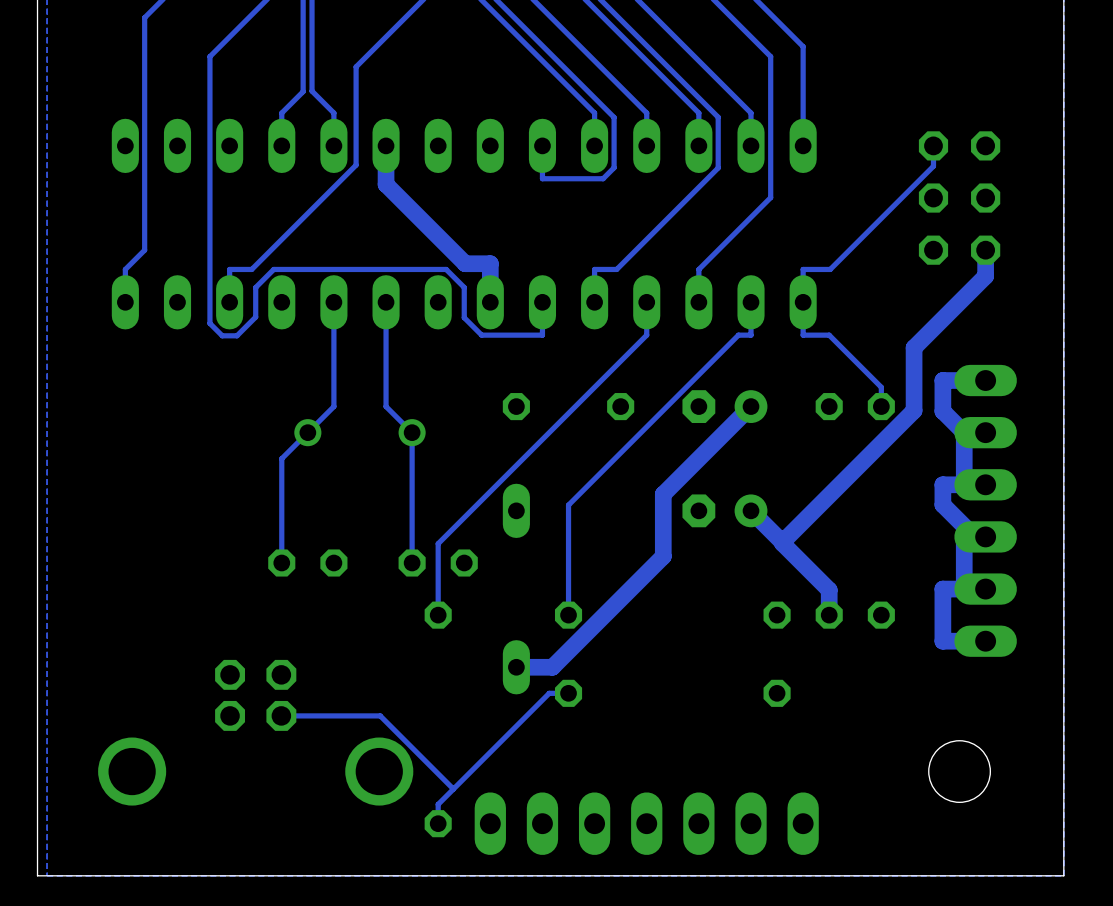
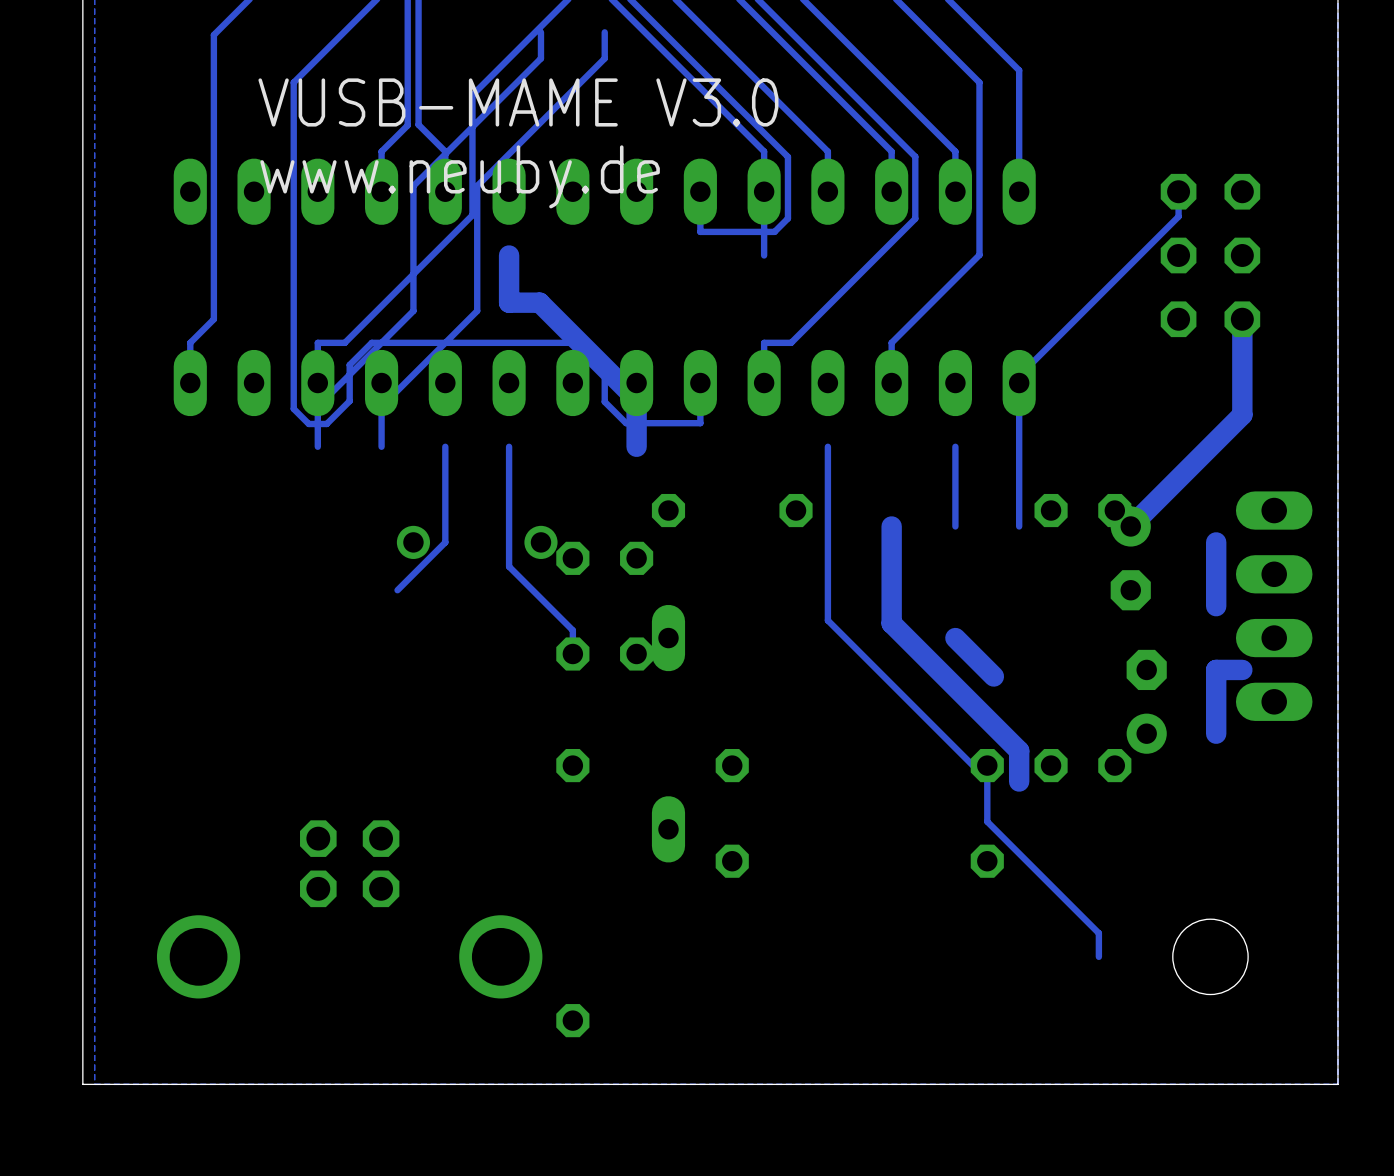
track: none -> (540, 32) (540, 58) (413, 186) (413, 310) (317, 406) (317, 446)
track: none -> (604, 32) (604, 58) (477, 186) (477, 310) (381, 406) (381, 446)
text: none -> VUSB-MAME V3.0 (518, 102)
text: none -> www.neuby.de (460, 176)
track: (386, 145) (386, 184) (465, 263) (490, 263) (490, 302) -> none
track: none -> (509, 255) (509, 302) (539, 302) (636, 399) (636, 446)
track: (830, 269) (803, 269) (803, 296) -> (1052, 342) (1019, 376)
track: (985, 276) (914, 347) (914, 410) (782, 542) (829, 590) (829, 615) -> (1242, 351) (1242, 414) (1130, 526)
track: (333, 302) (333, 354) -> none
track: (386, 302) (386, 354) -> (764, 191) (764, 255)
track: (646, 302) (646, 335) (438, 543) (438, 615) -> none
track: (751, 302) (751, 335) (738, 335) (568, 505) (568, 615) -> none
track: (803, 335) (829, 335) (881, 387) (881, 406) -> (1019, 423) (1019, 526)
track: none -> (827, 446) (827, 620) (987, 779) (987, 821) (1098, 933) (1098, 956)
track: none -> (955, 446) (955, 526)
track: (985, 380) (942, 380) (942, 411) (964, 432) (985, 432) -> none
track: (333, 406) (281, 458) (281, 562) -> (445, 510) (445, 542) (397, 590)
track: (386, 406) (412, 432) (412, 562) -> (509, 510) (509, 566) (572, 630) (572, 654)
part: (724, 406) -> none
track: (751, 406) (663, 494) (663, 556) (552, 667) (516, 667) -> none
track: none -> (891, 526) (891, 623) (1019, 750) (1019, 781)
part: none -> (604, 558)
part: none -> (1130, 558)
track: (985, 484) (942, 484) (942, 504) (974, 536) -> none
part: none -> (1274, 606)
part: (724, 510) -> none
part: (985, 510) -> none
part: (307, 562) -> none
part position: (438, 562) -> (604, 654)
part: none -> (1146, 701)
track: (985, 589) (942, 589) (942, 641) (985, 641) -> none
track: (568, 693) (549, 693) (438, 804) (438, 823) -> none
track: (281, 715) (380, 715) (453, 789) -> none
part: (646, 823) -> none

